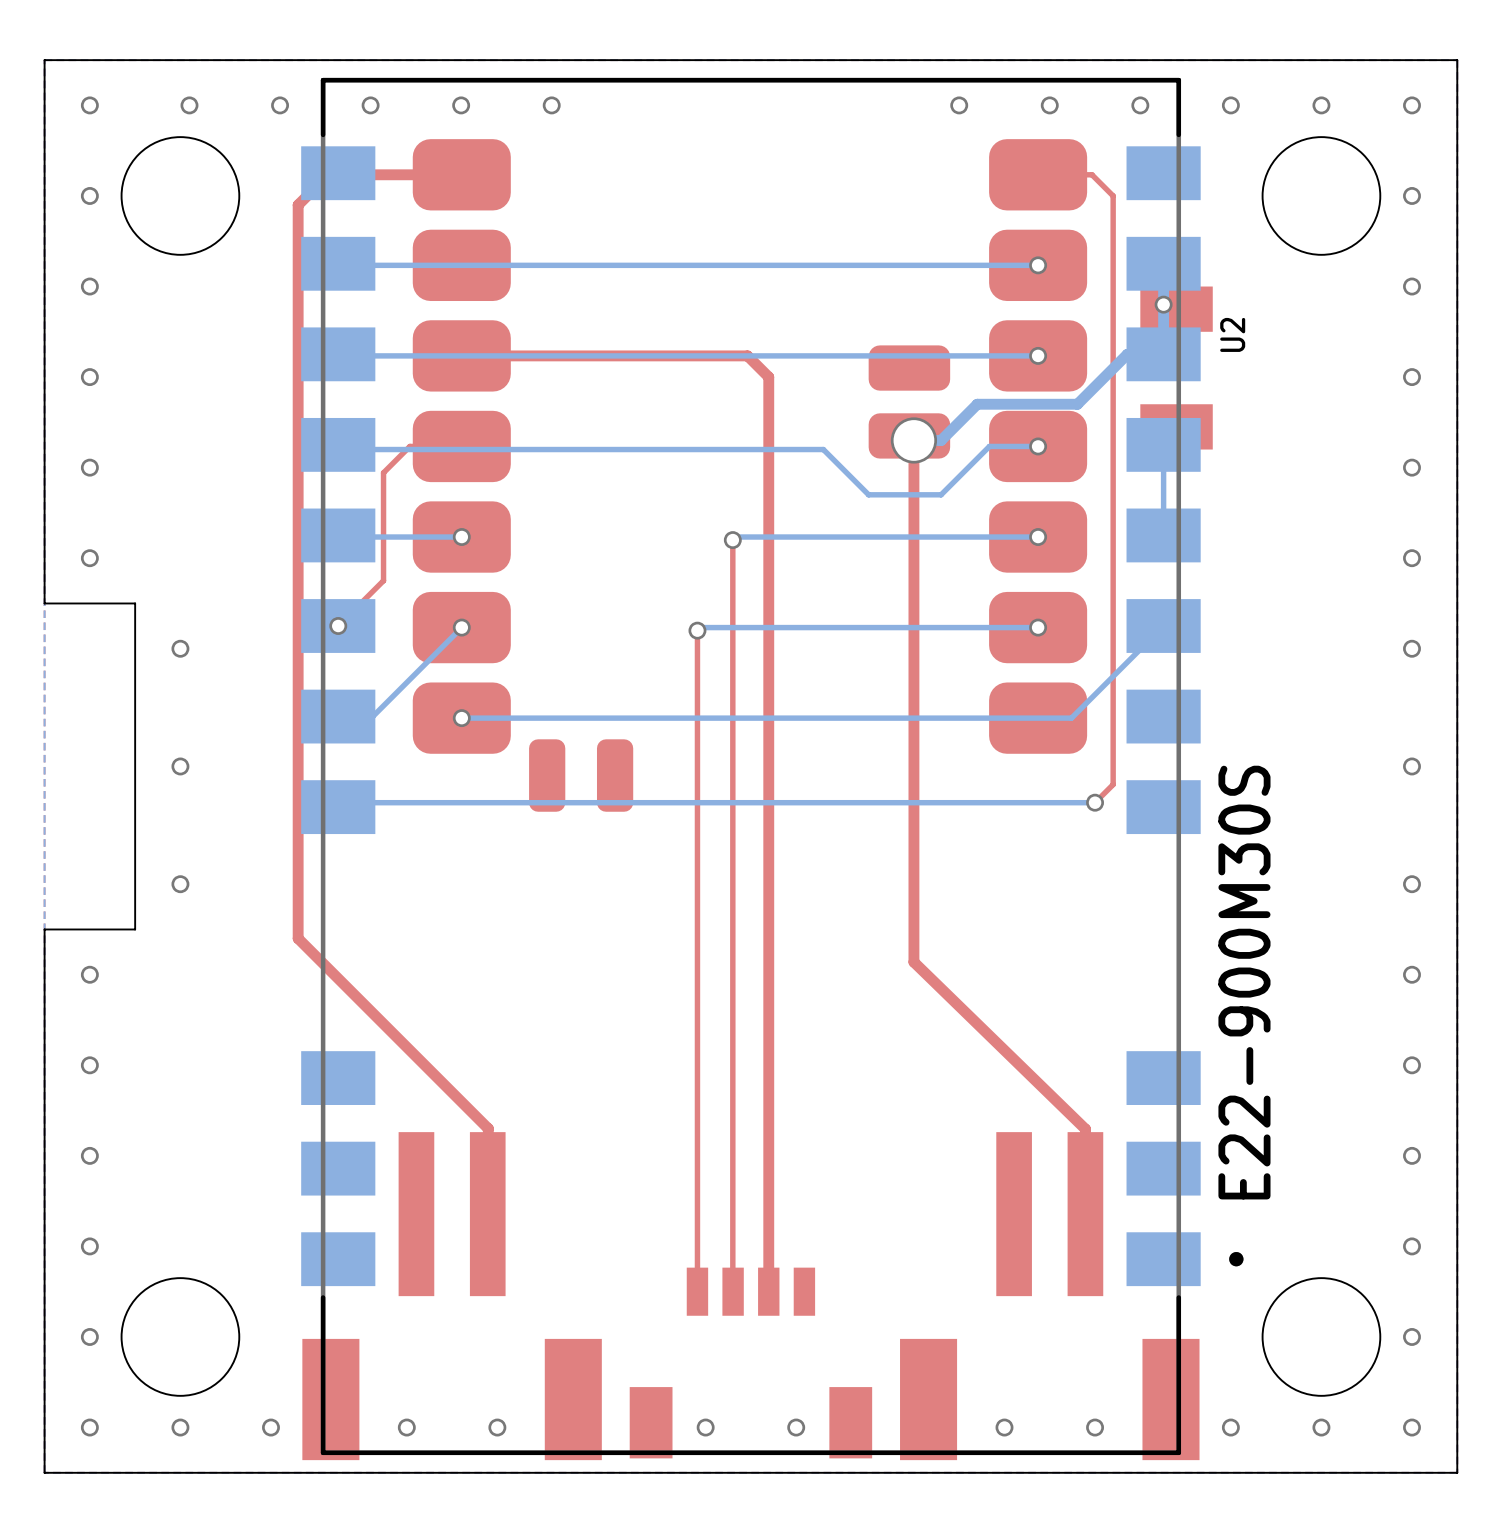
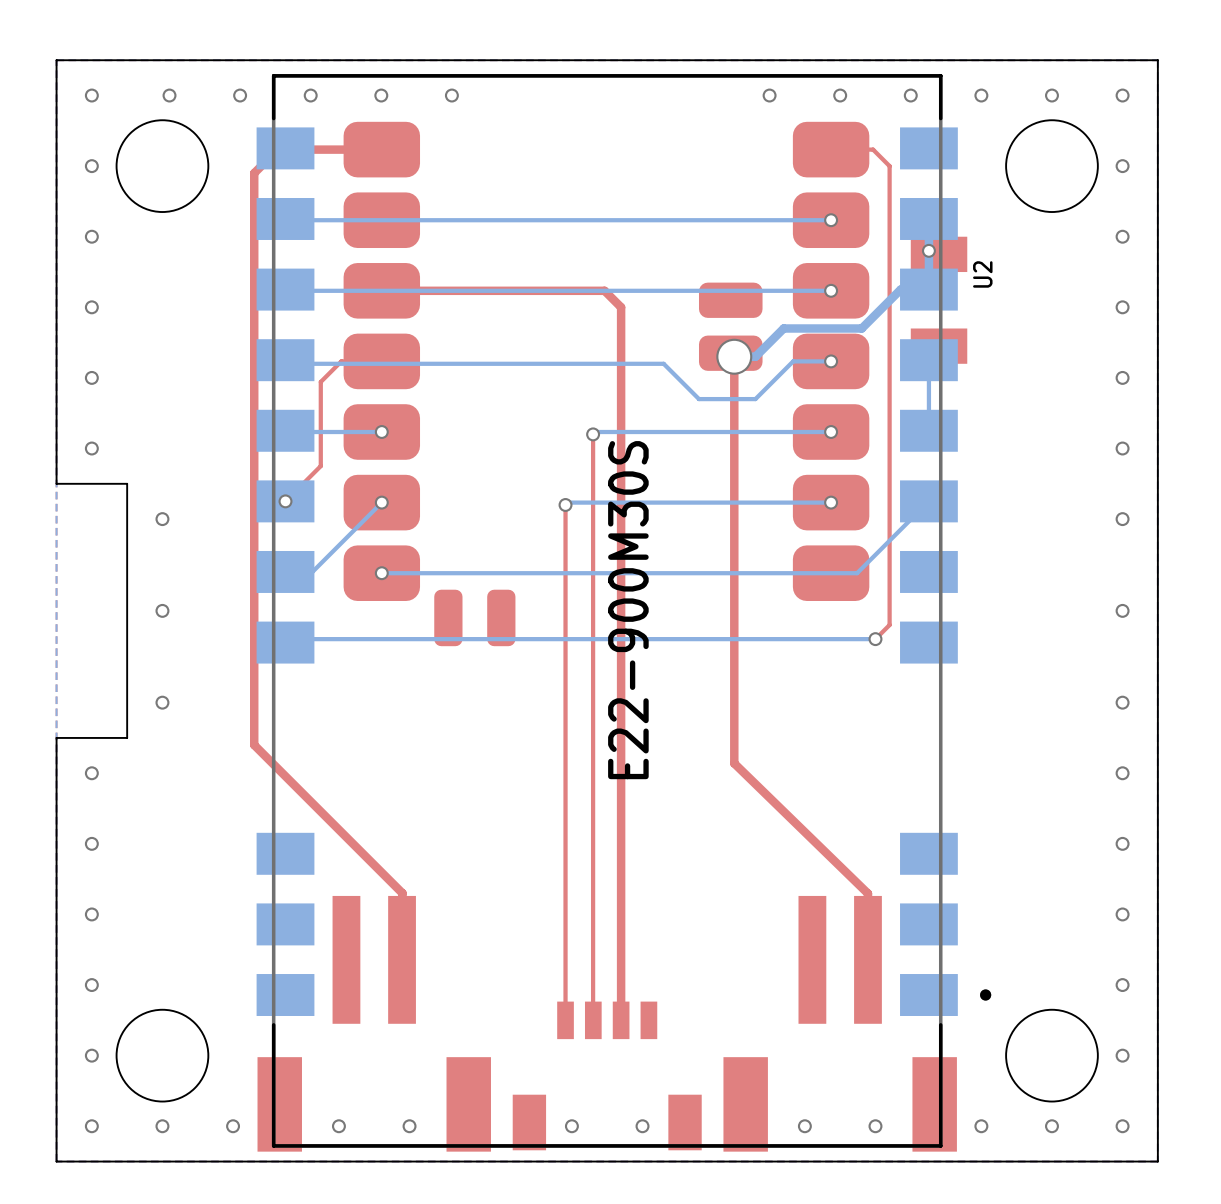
U2 value position: E22-900M30S (1244, 982) -> E22-900M30S (628, 610)

